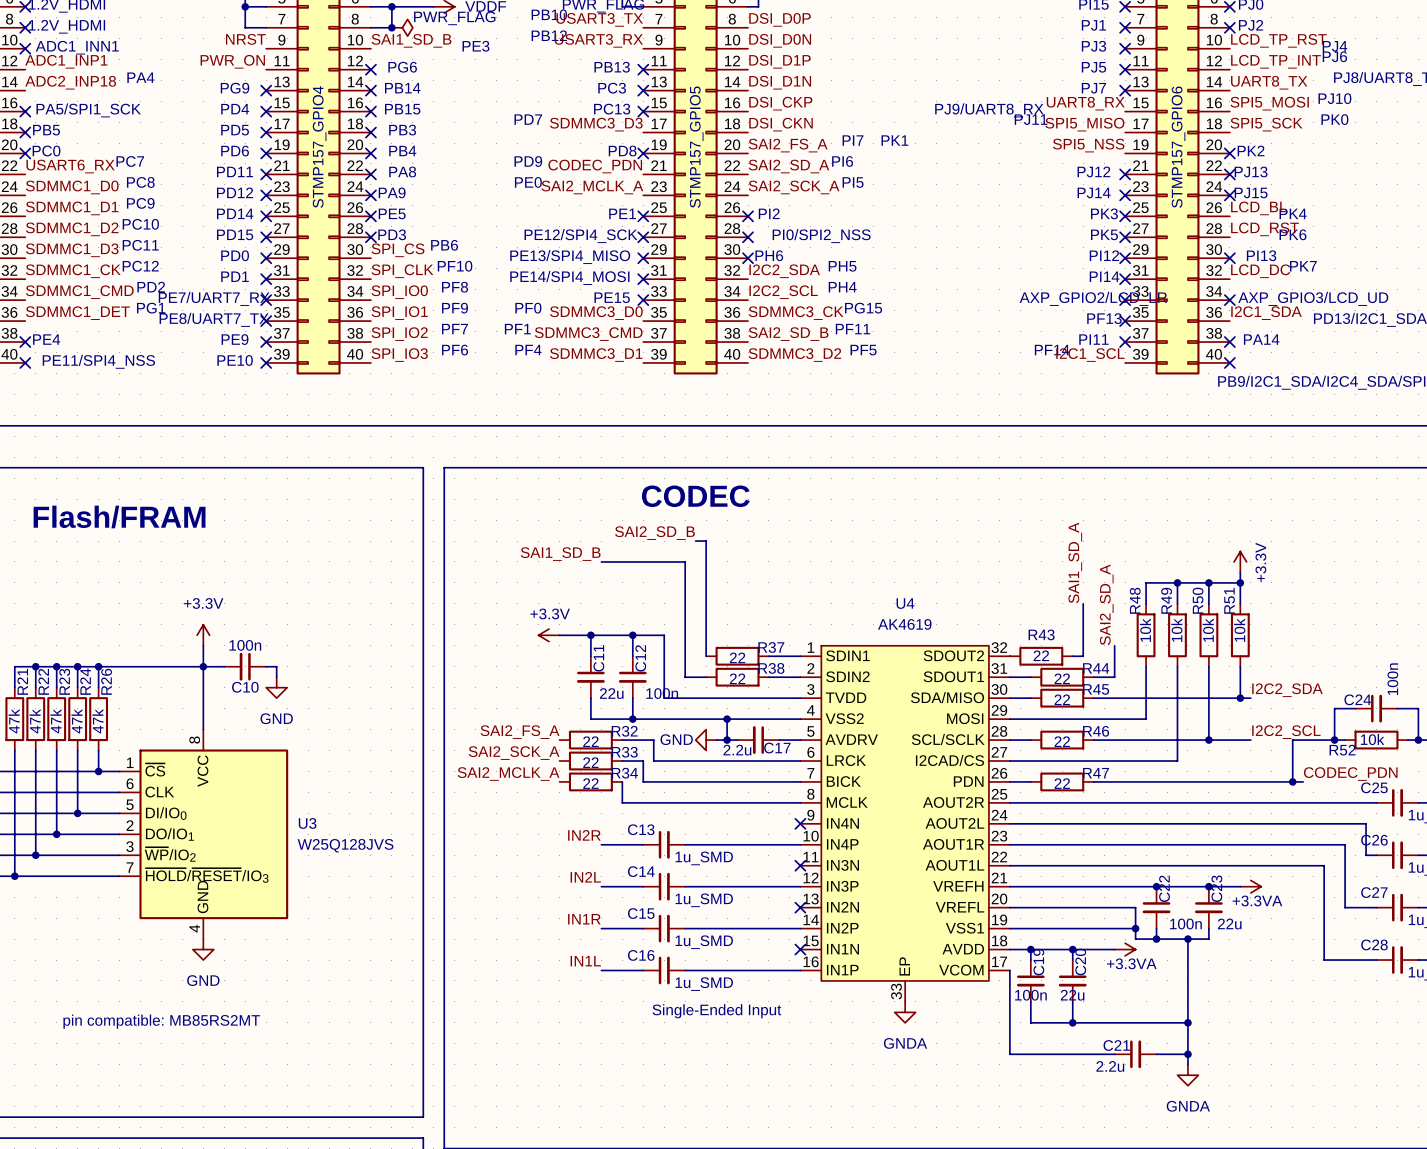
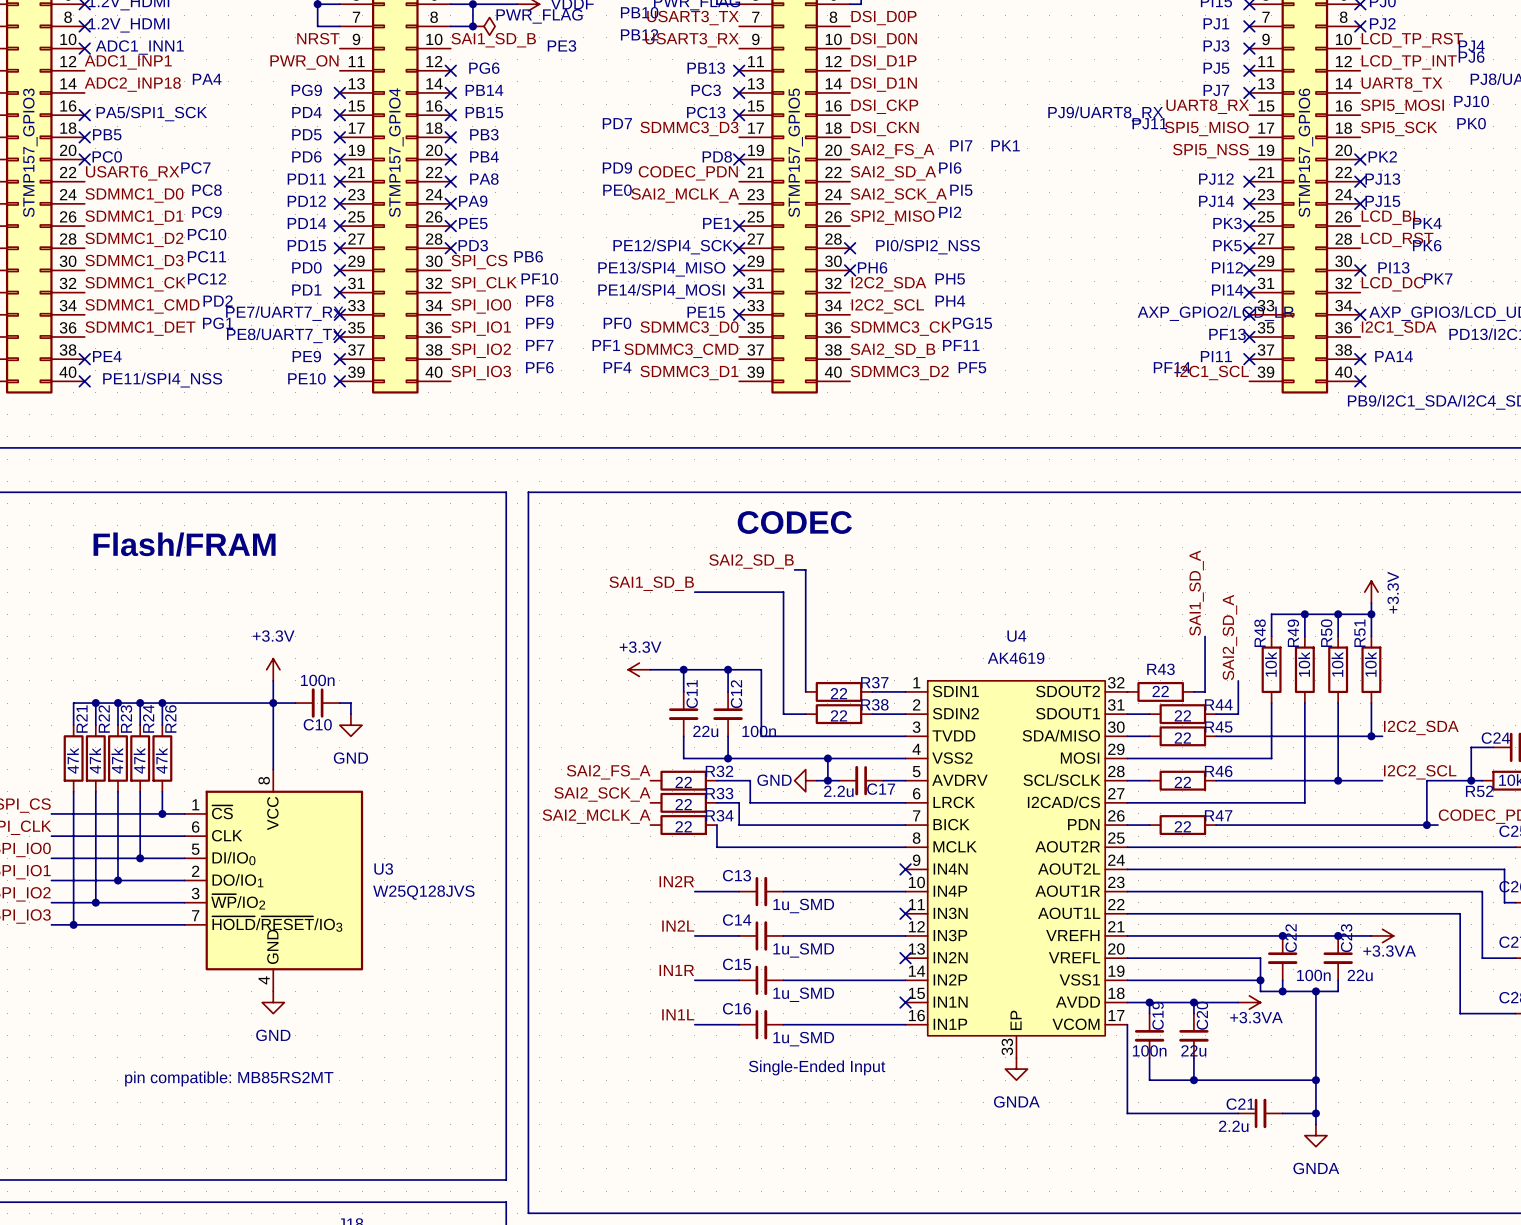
label: none -> SPI2_MISO (892, 217)
text position: PI2 (769, 213) -> PI2 (950, 212)
no-connect mark: (748, 216) -> none

